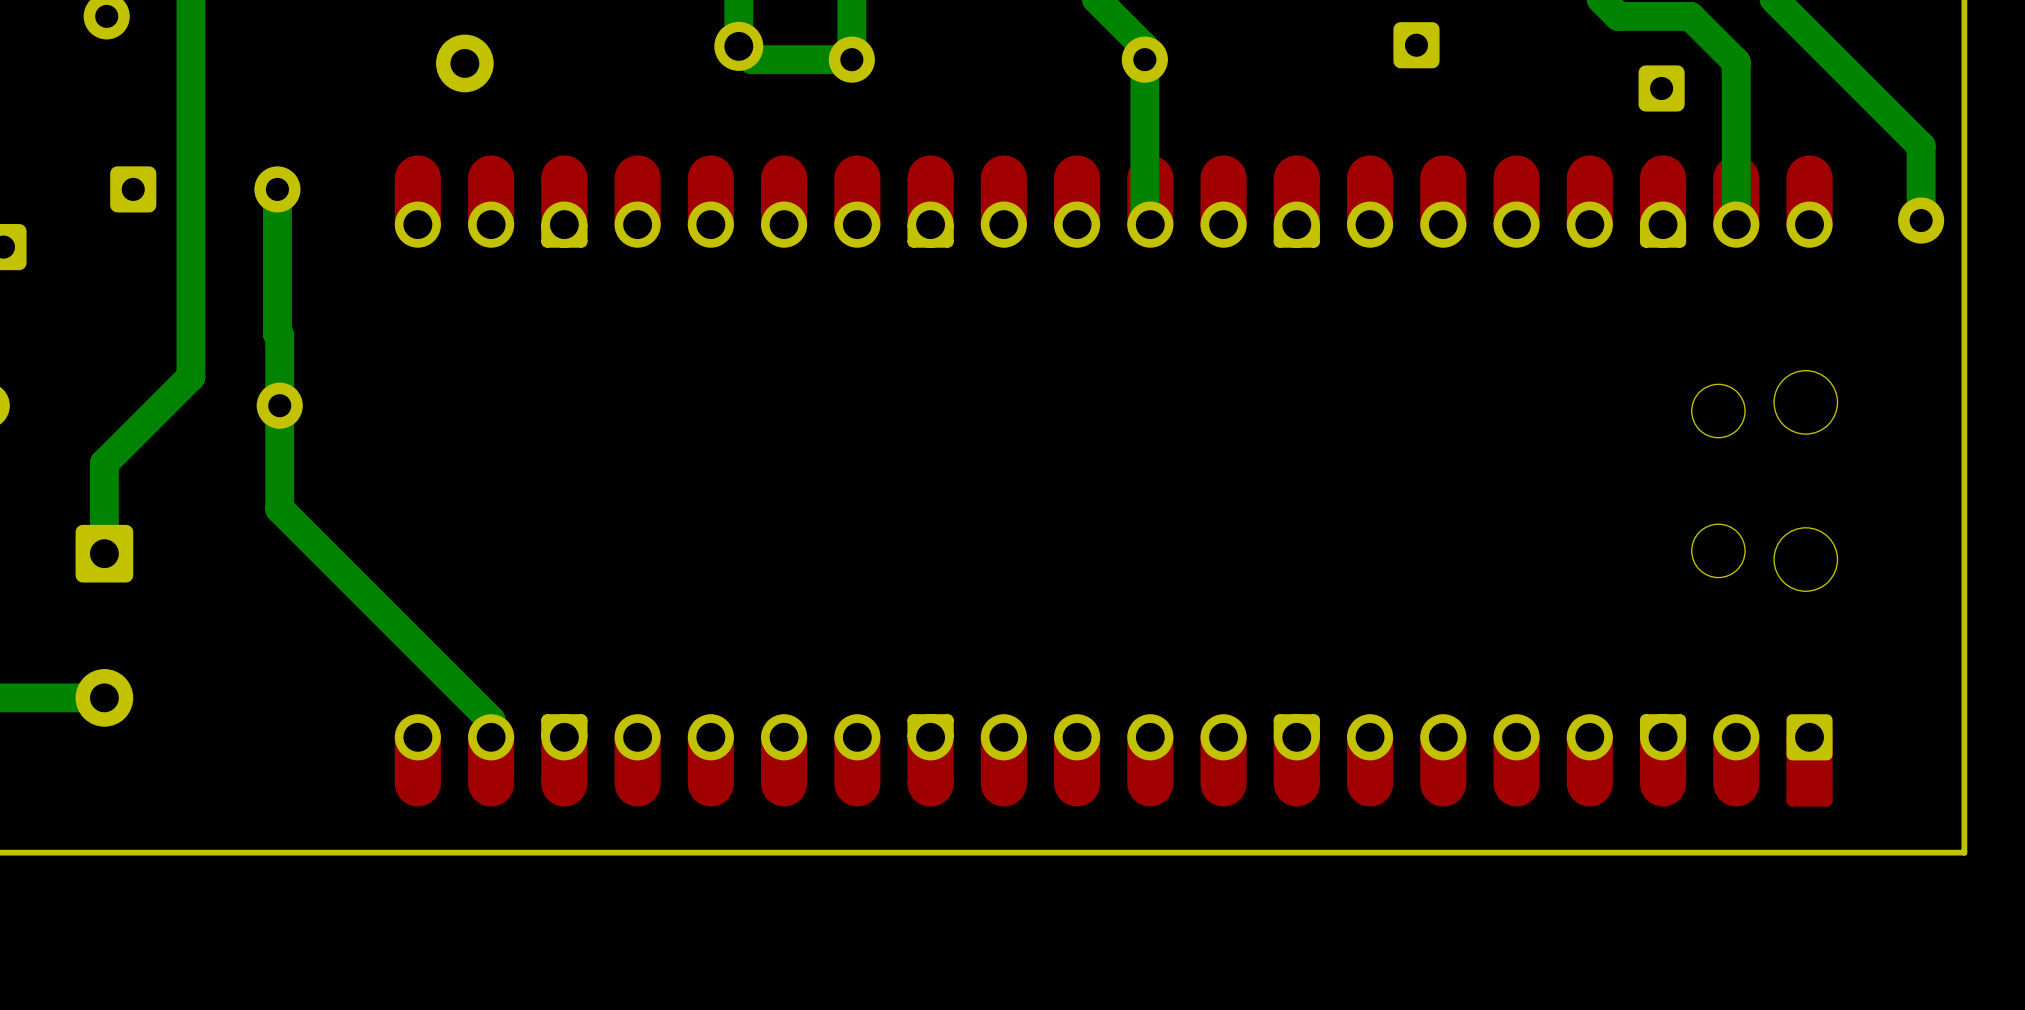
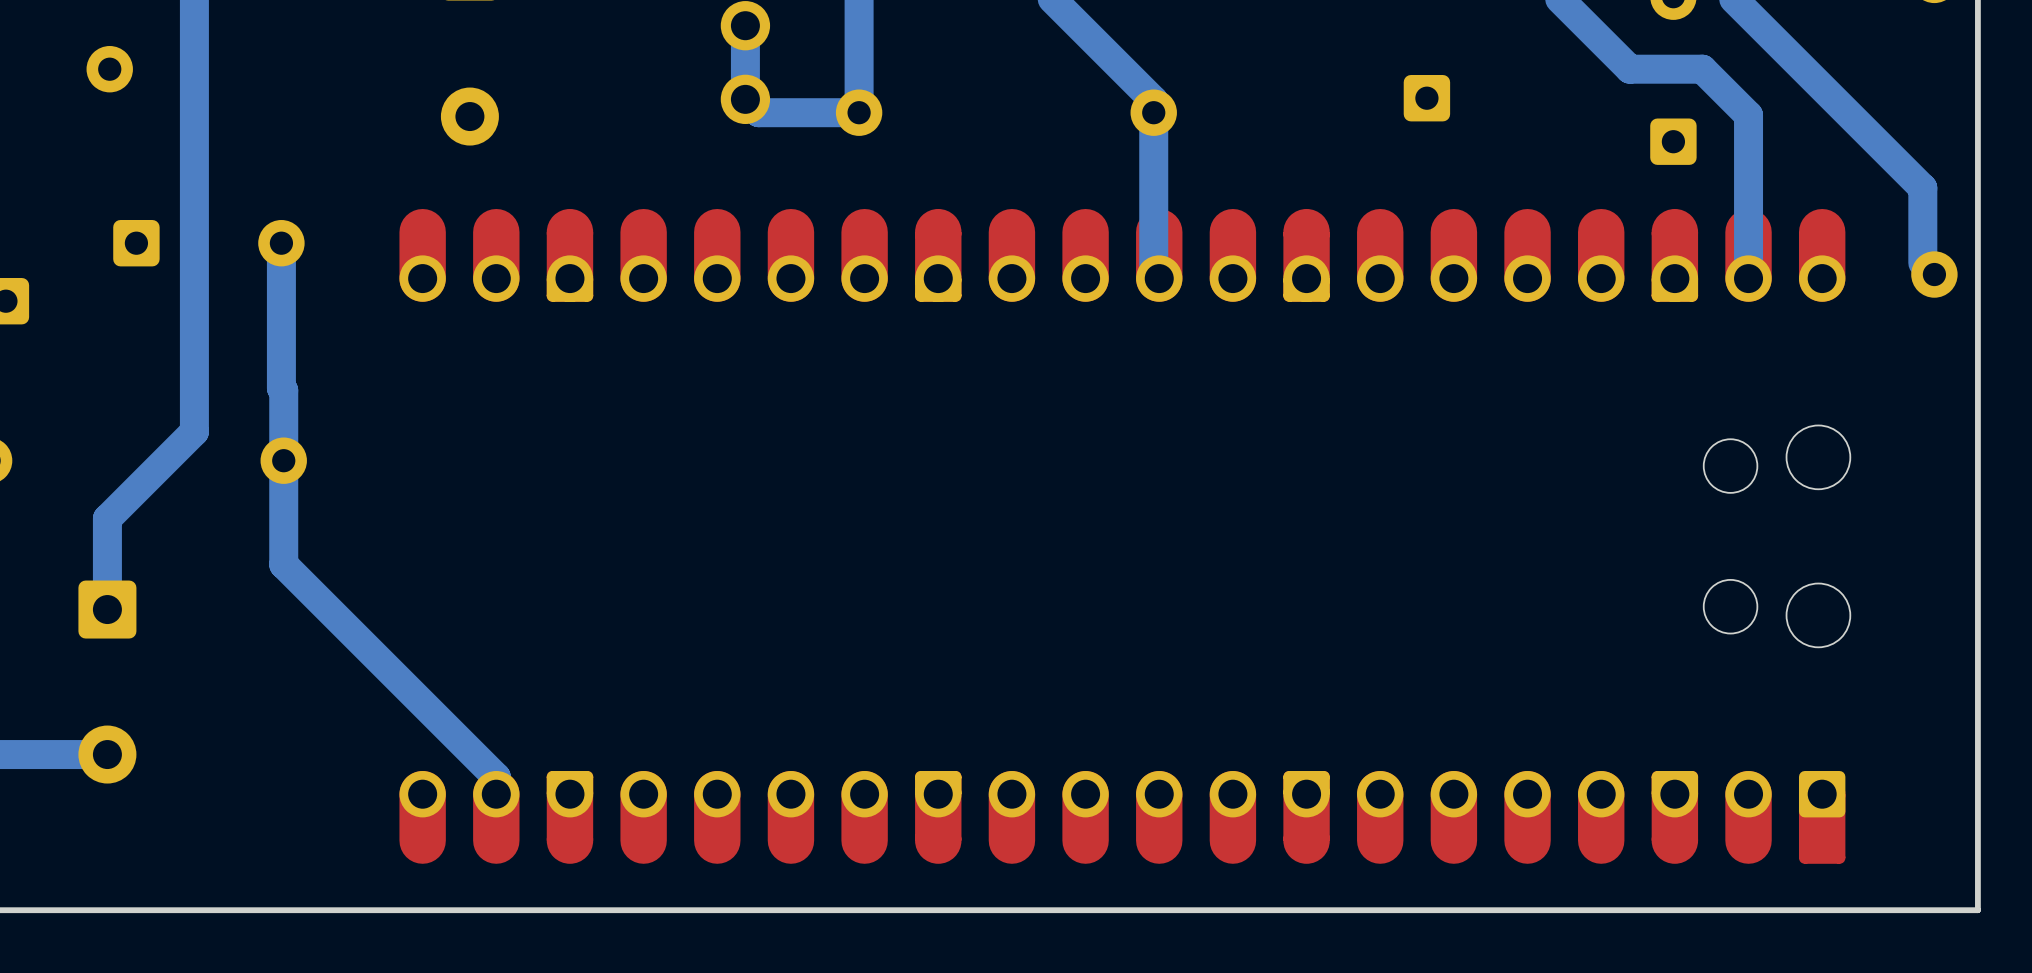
bottom track: (1909, 134) (1921, 146) (1921, 220) -> (1922, 188) (1922, 262)

